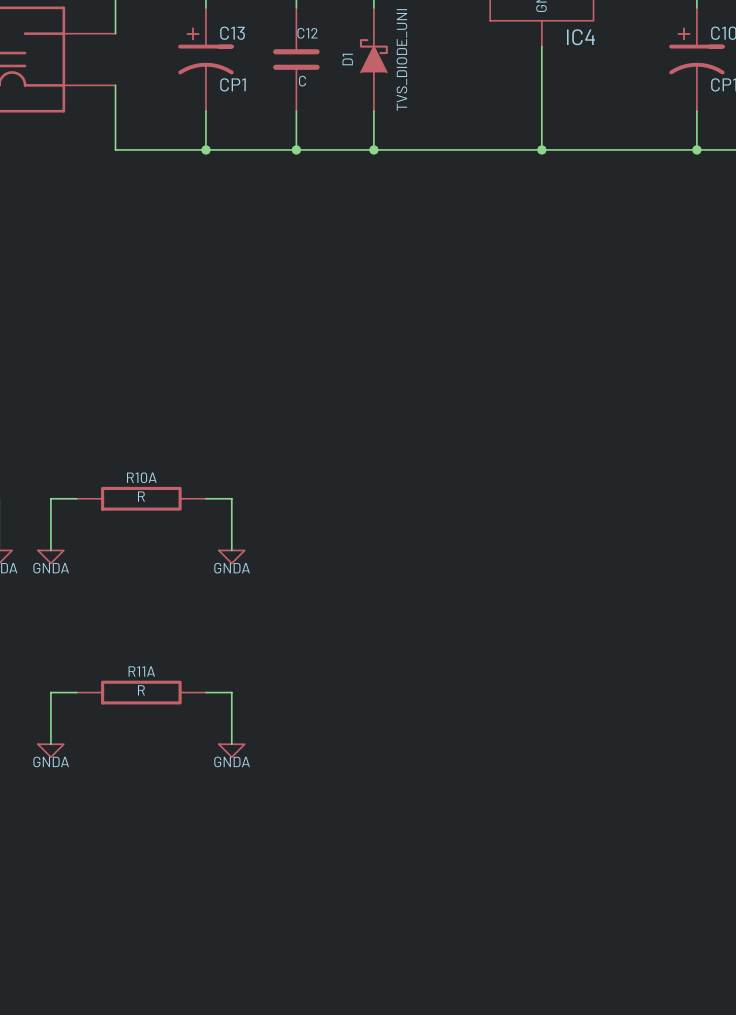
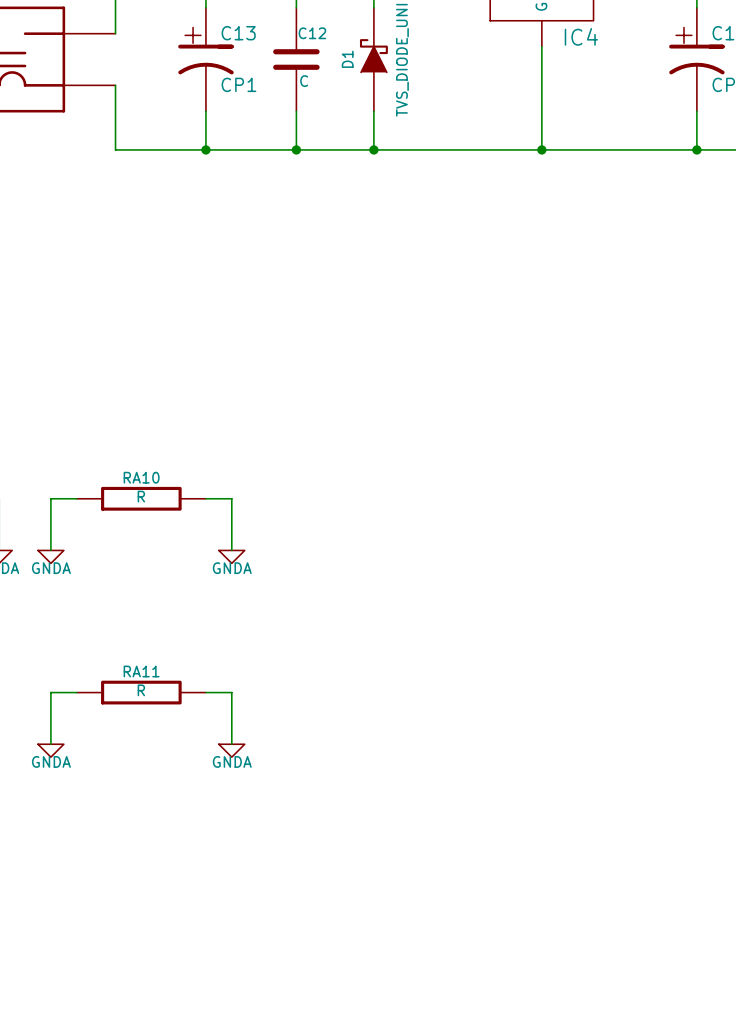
R10A name: R10A (141, 477) -> RA10 (141, 477)
R11A name: R11A (141, 671) -> RA11 (141, 671)

